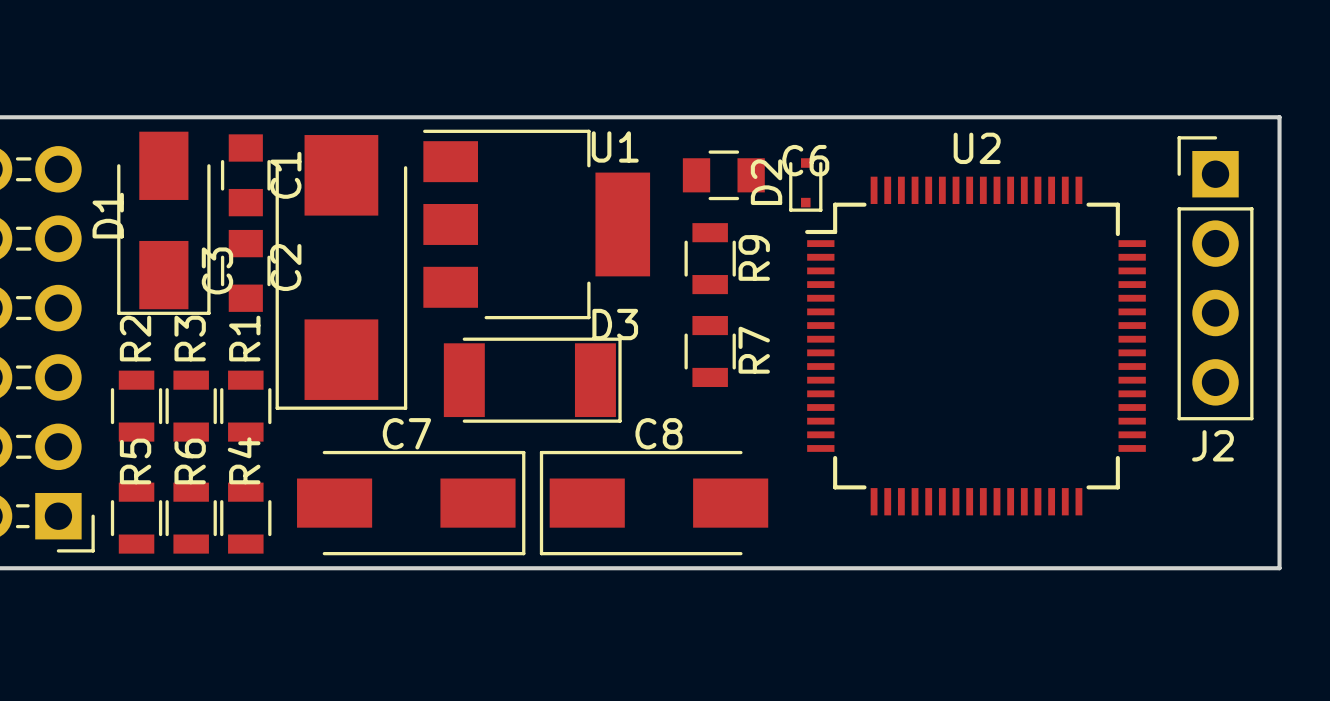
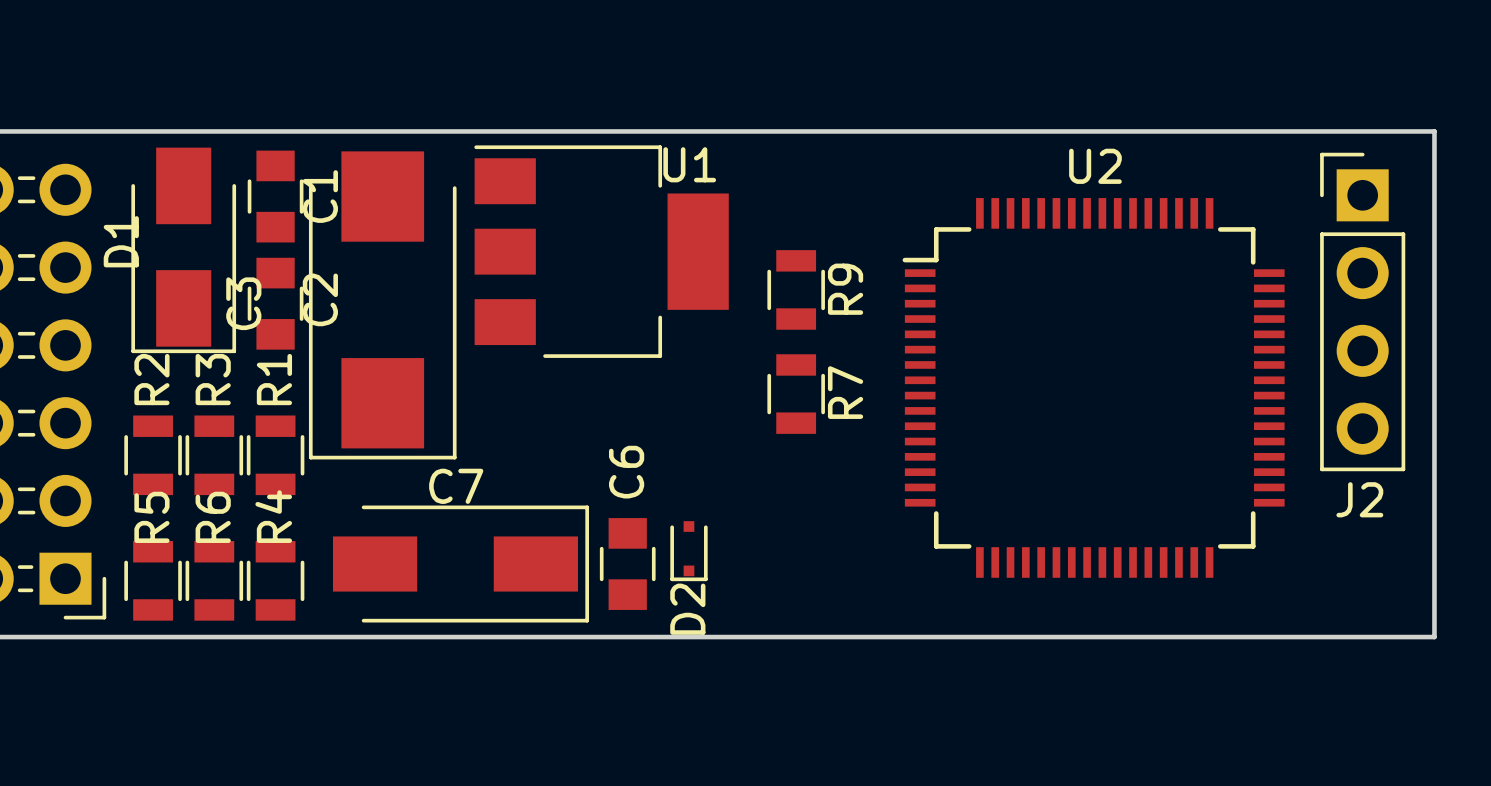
C6 name position: C6 (805, 160) -> C6 (626, 472)
C6 rotation: 0° (723, 175) -> 90° clockwise (627, 564)
C6 position: (723, 175) -> (627, 564)
D2 name position: D2 (766, 182) -> D2 (687, 609)
D2 position: (805, 185) -> (688, 551)
D3: (532, 380) -> none
C8: (654, 503) -> none

